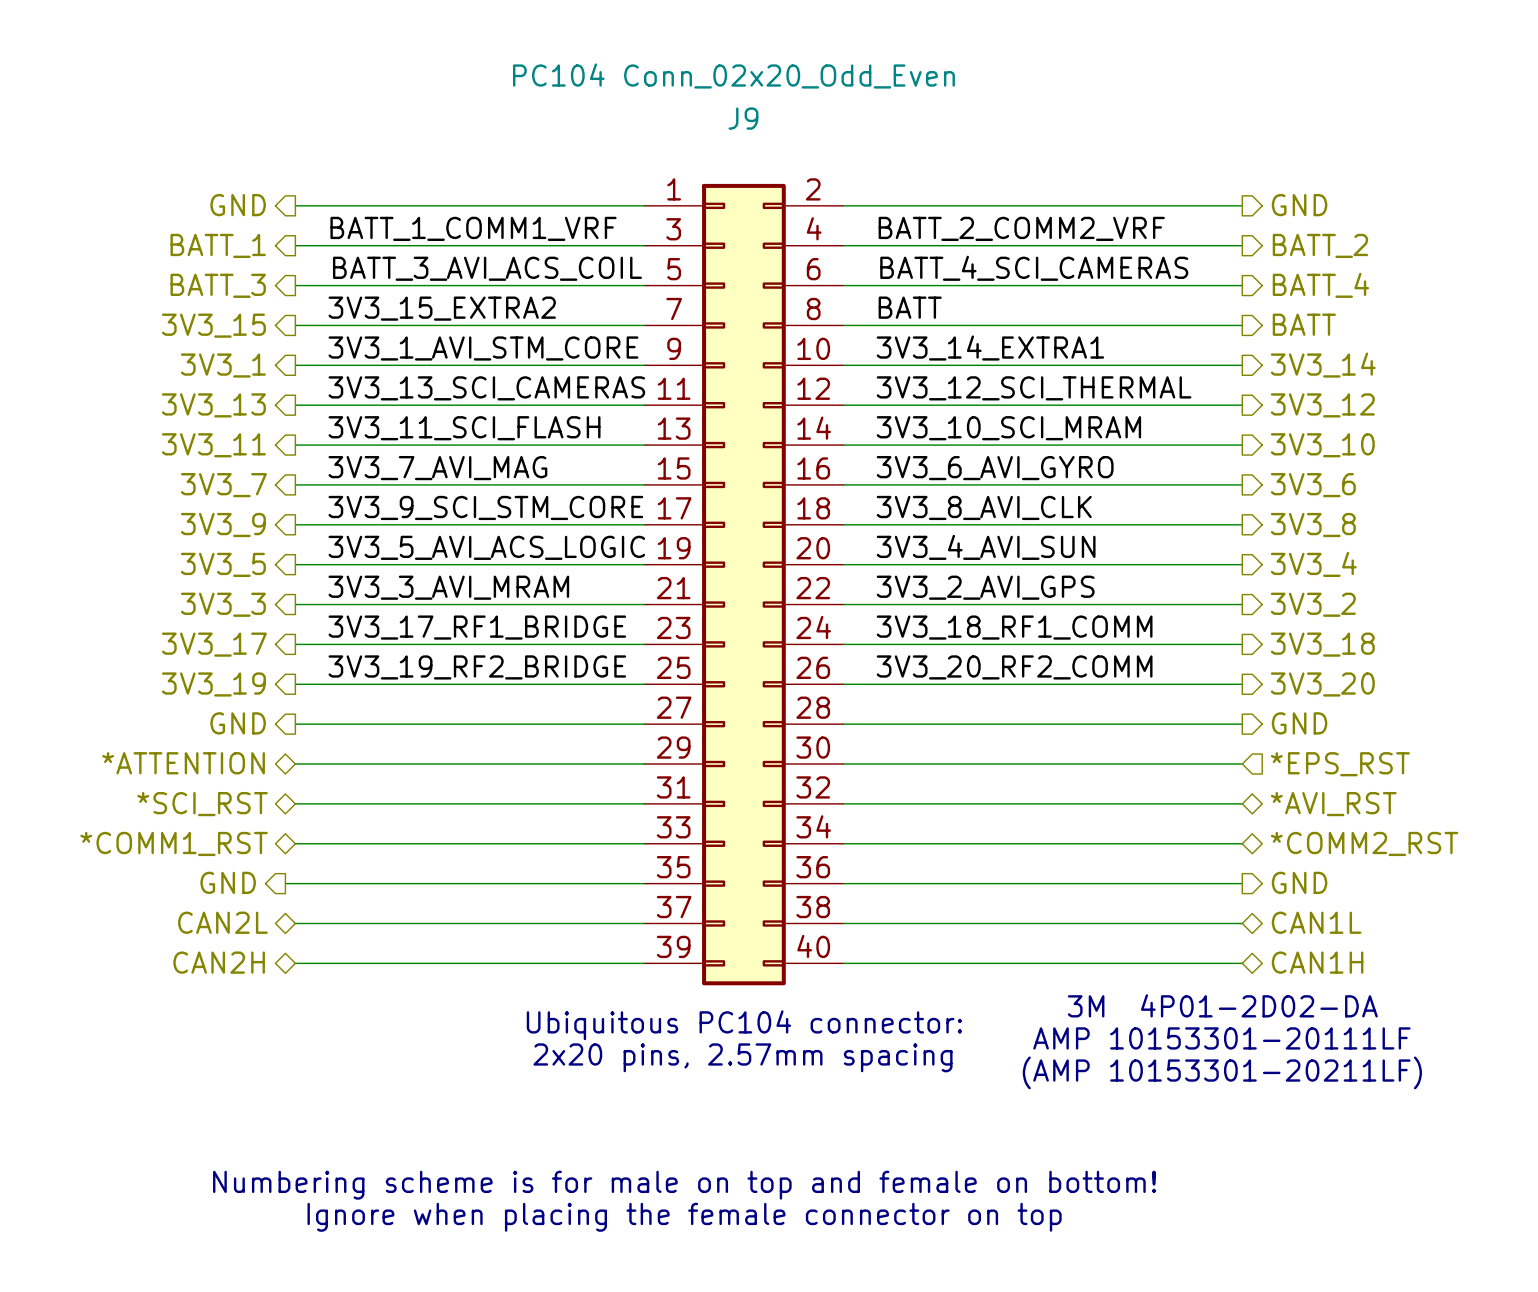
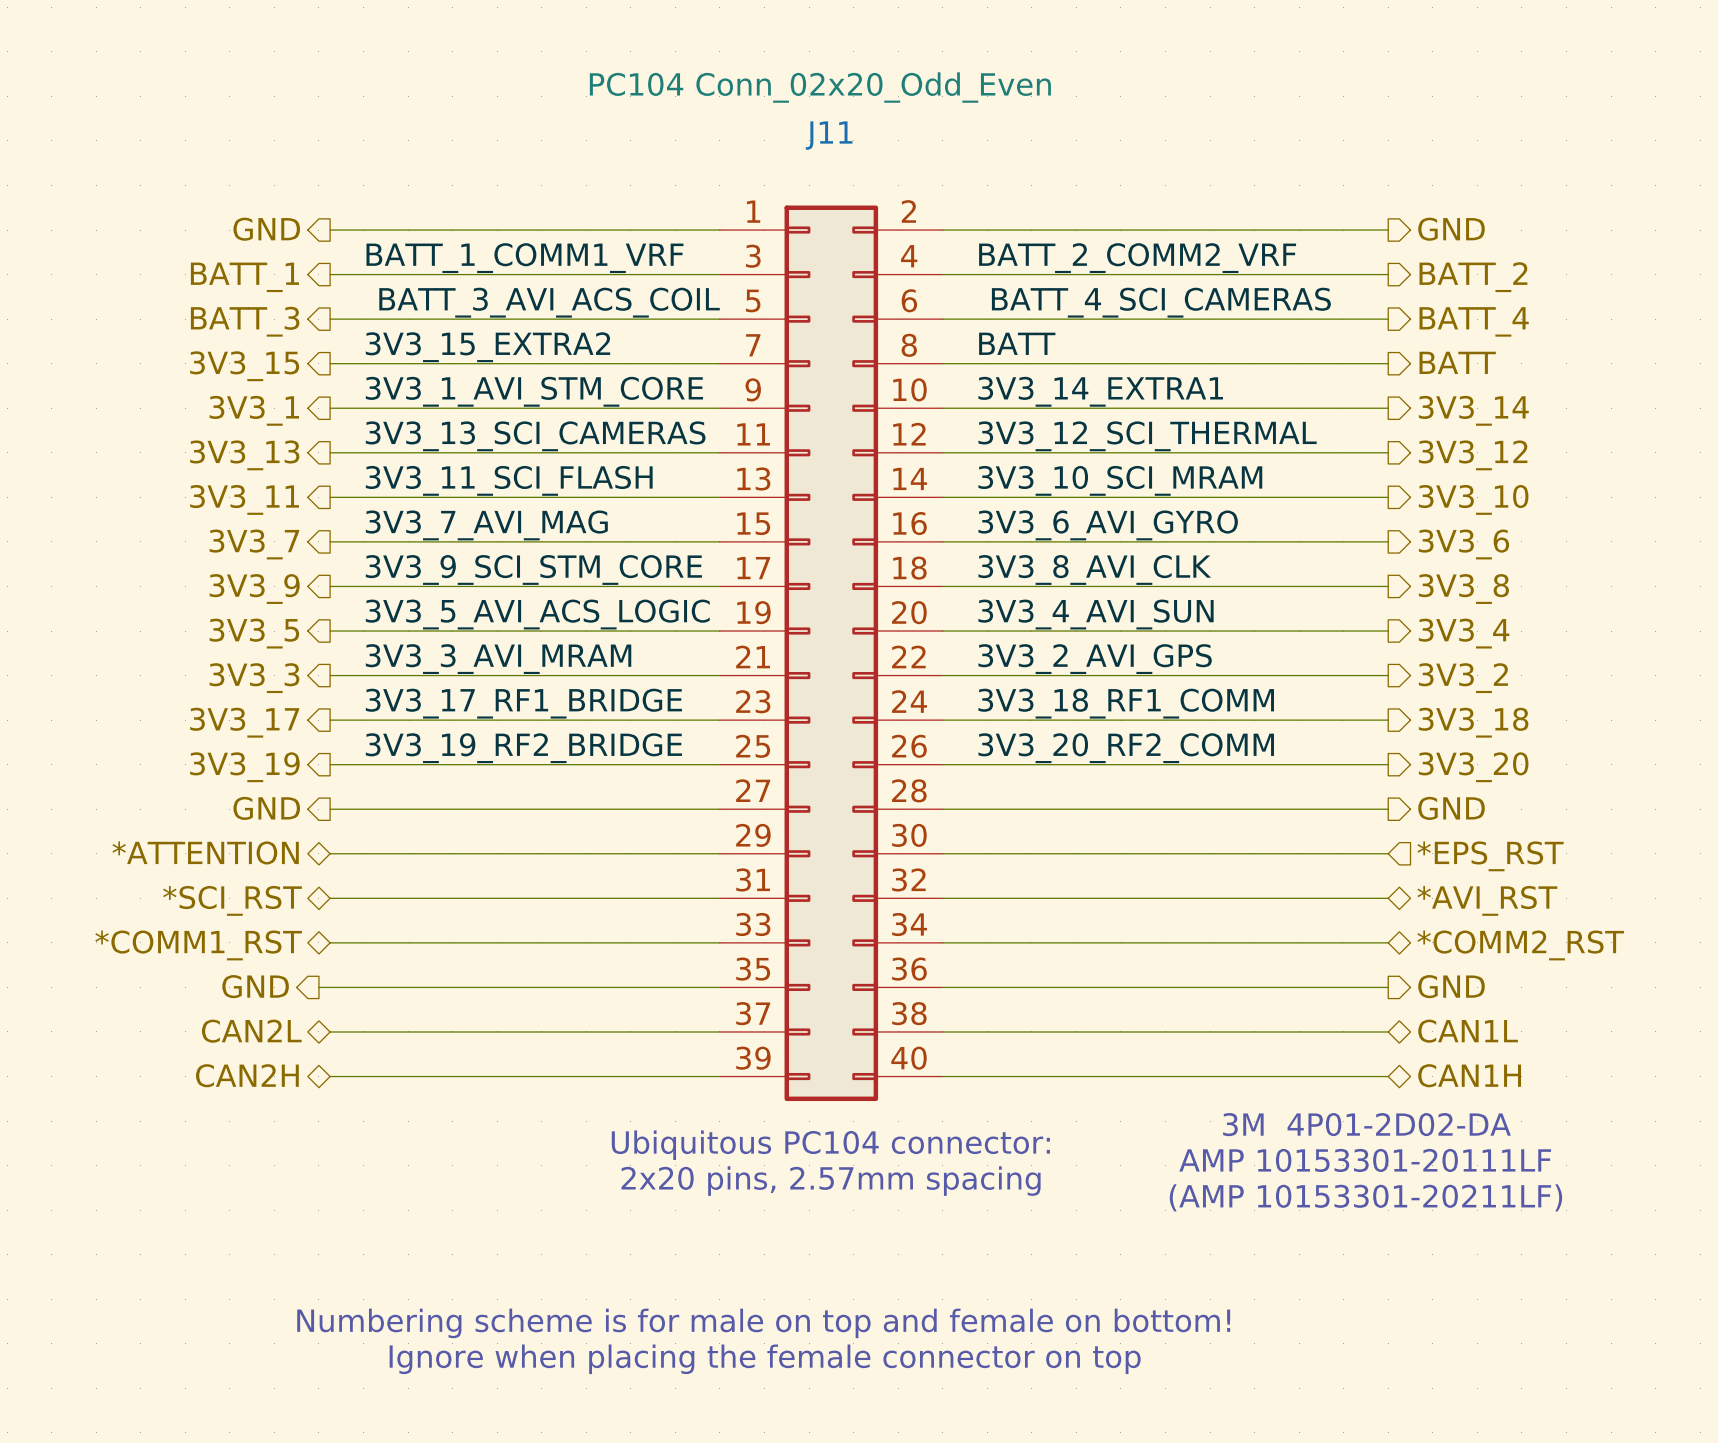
J9 name: J9 (743, 118) -> J11 (829, 135)

